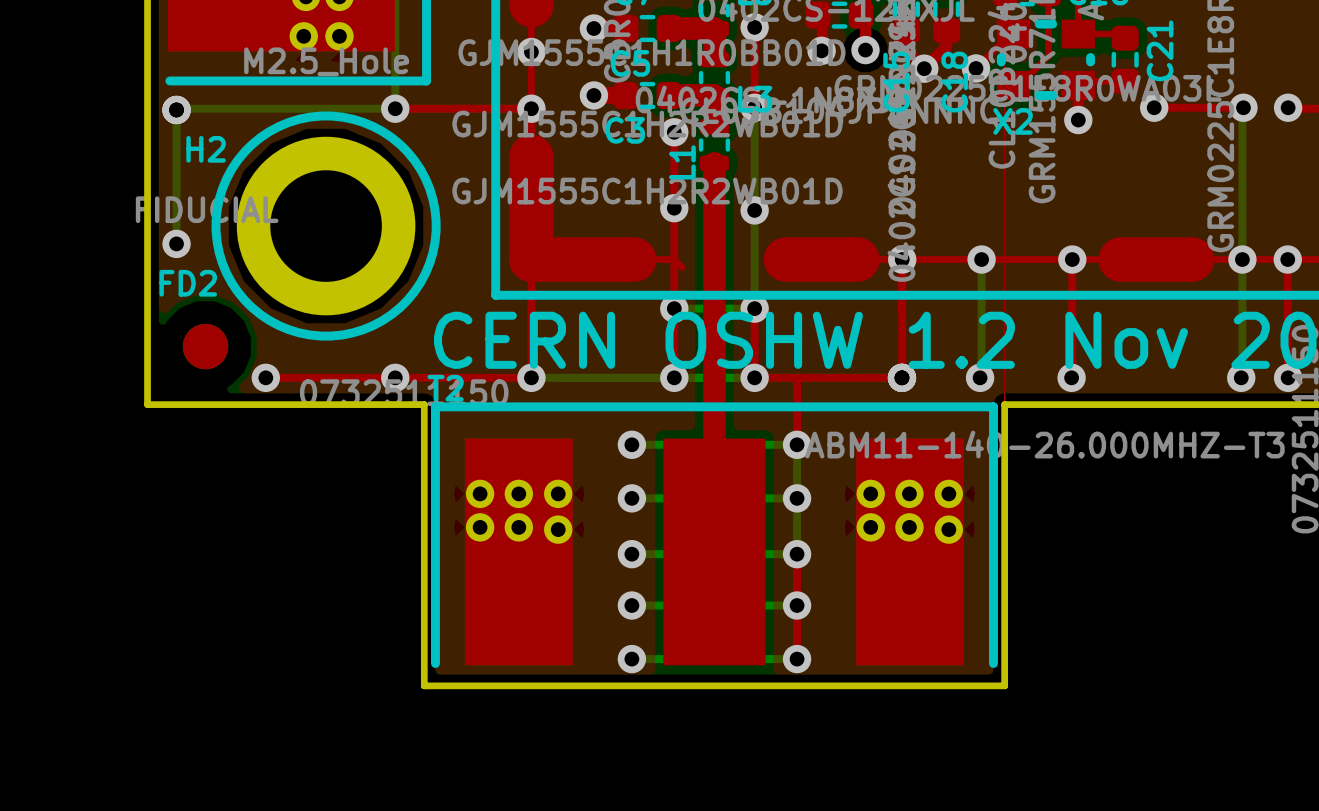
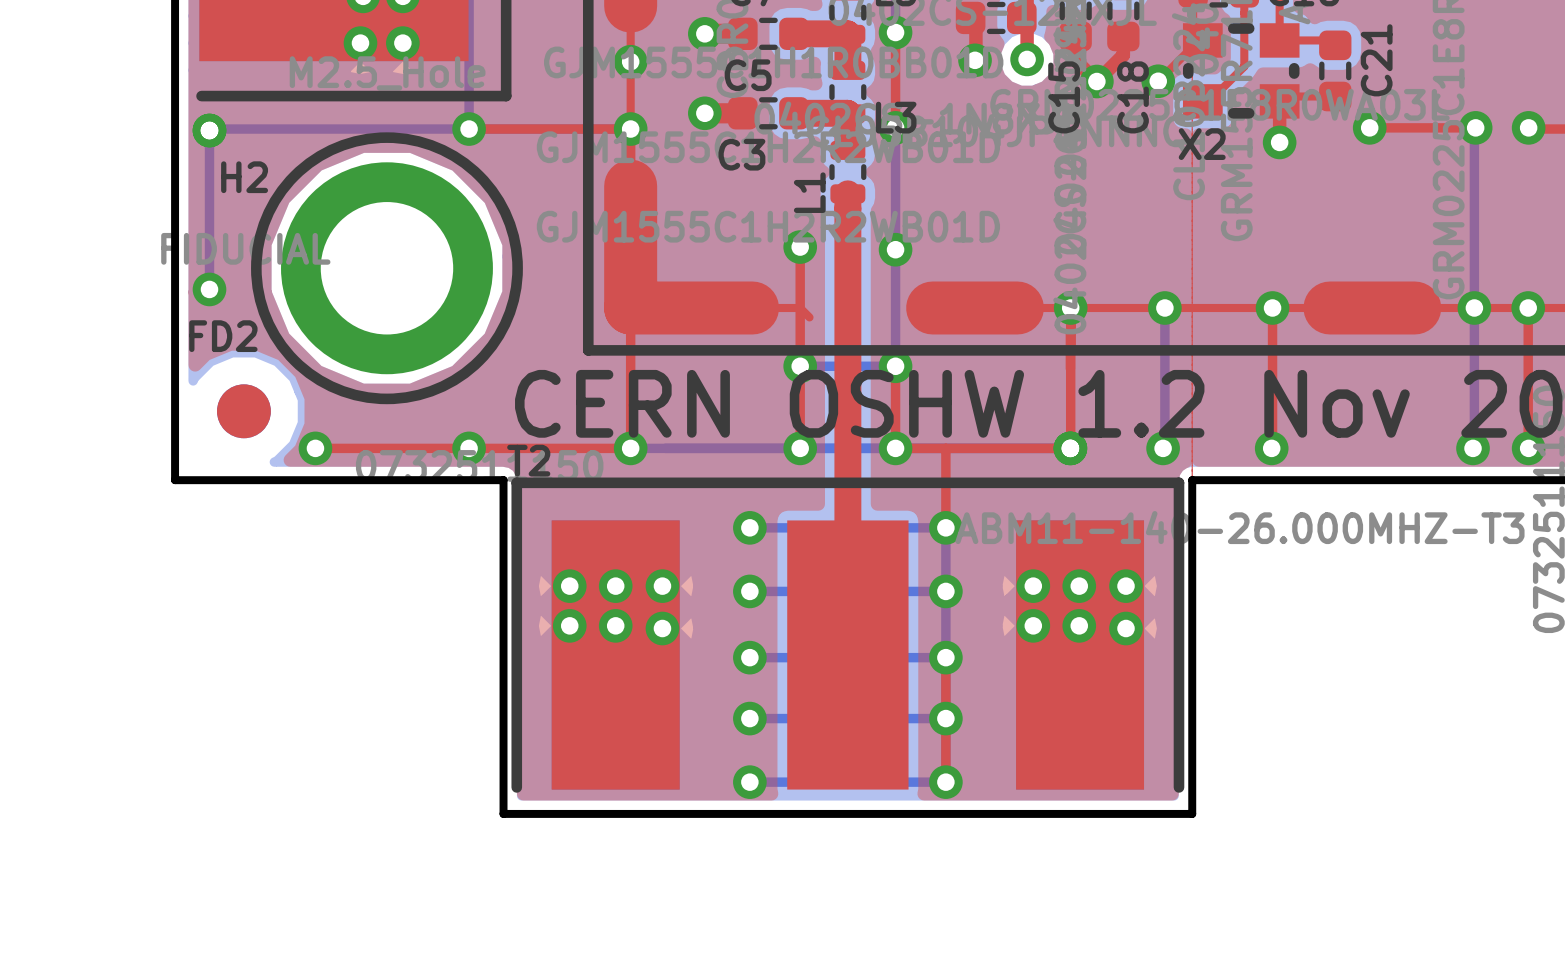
top track: (674, 132) (674, 208) -> none
via: (674, 132) -> none

